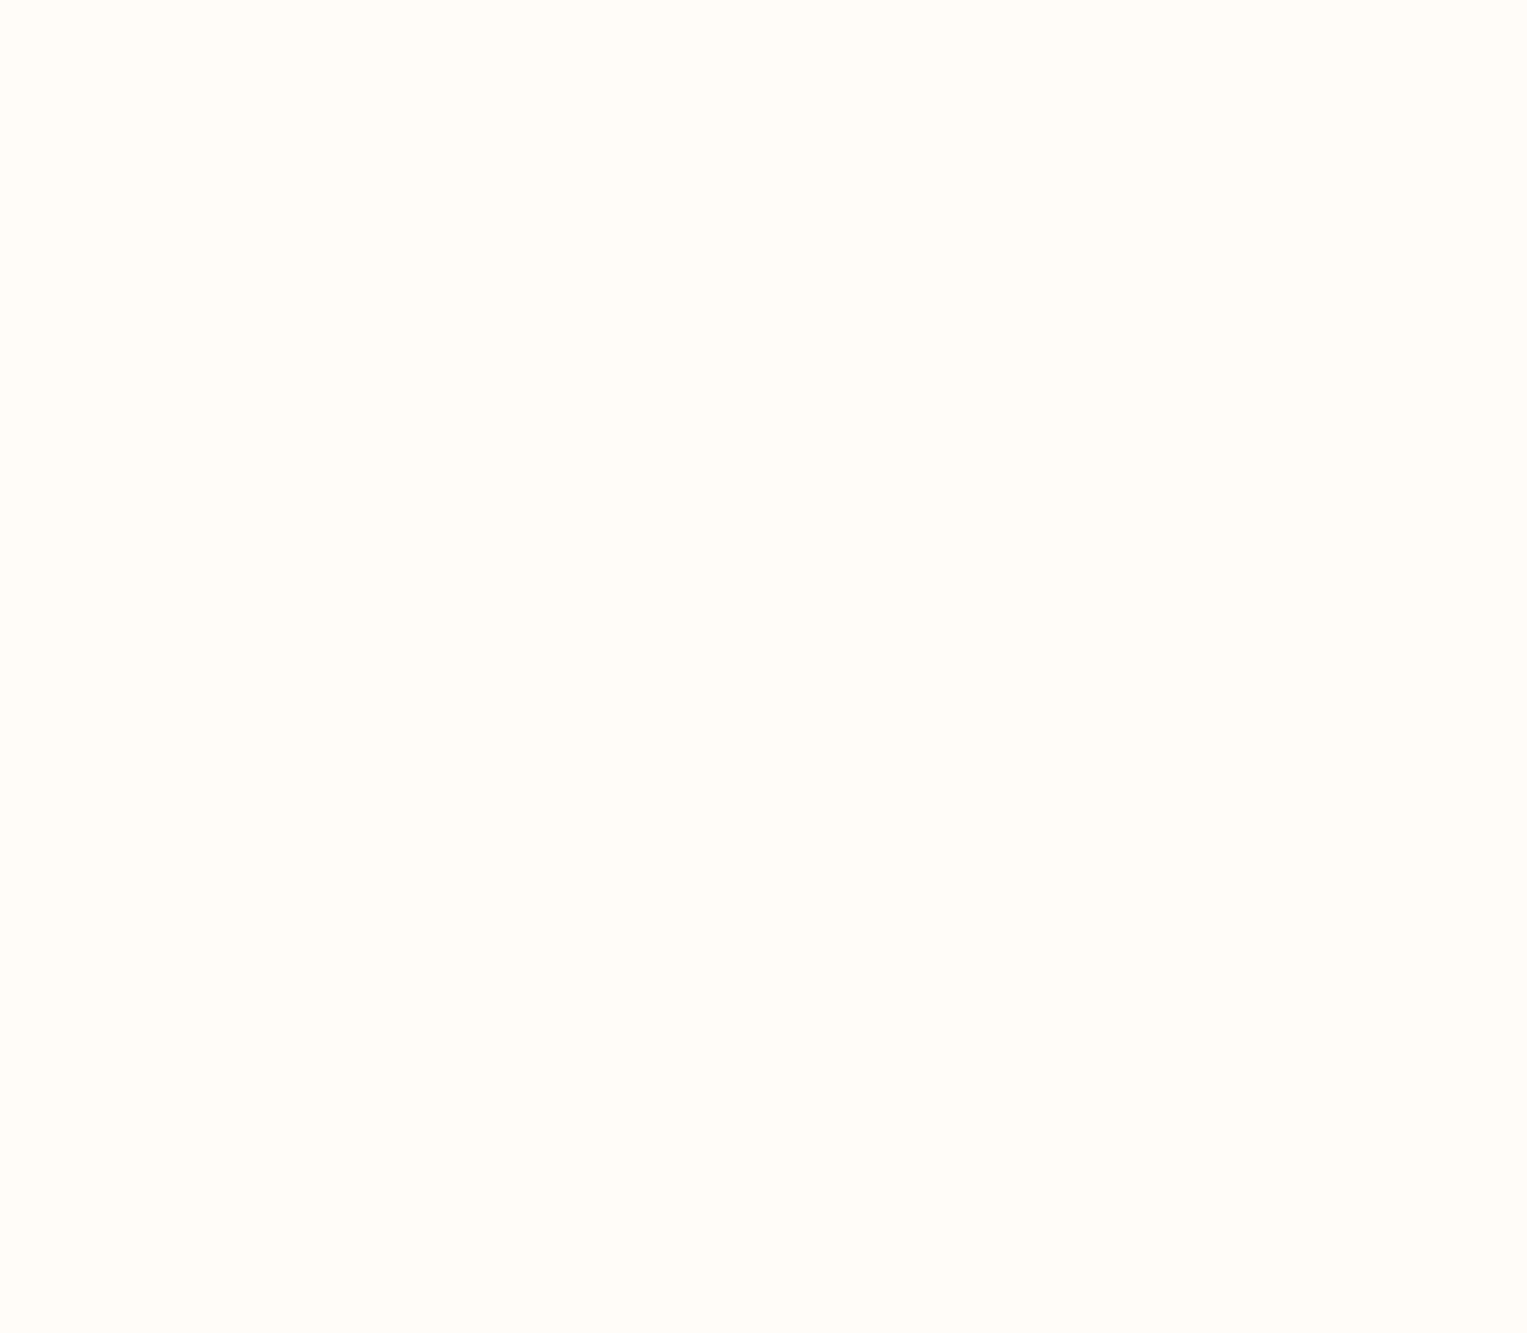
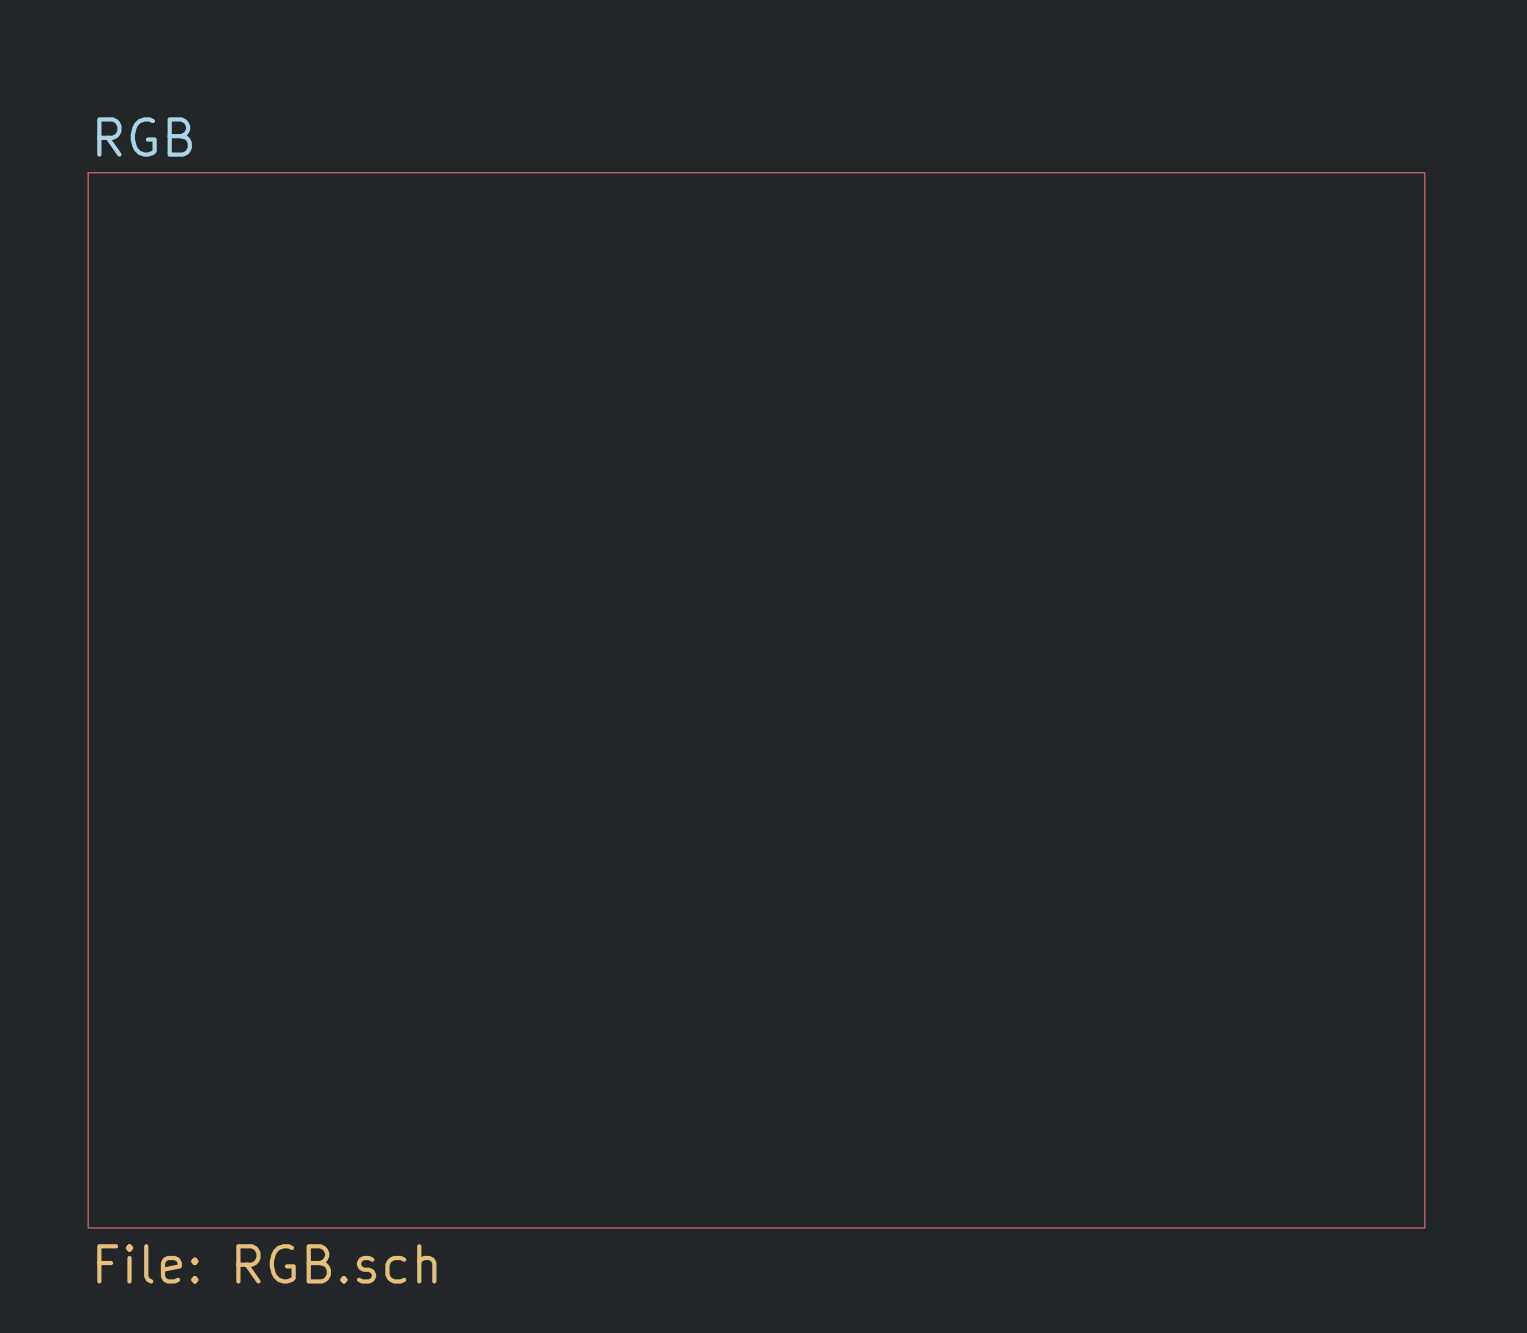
sheet RGB: none -> File: RGB.sch (756, 700)

